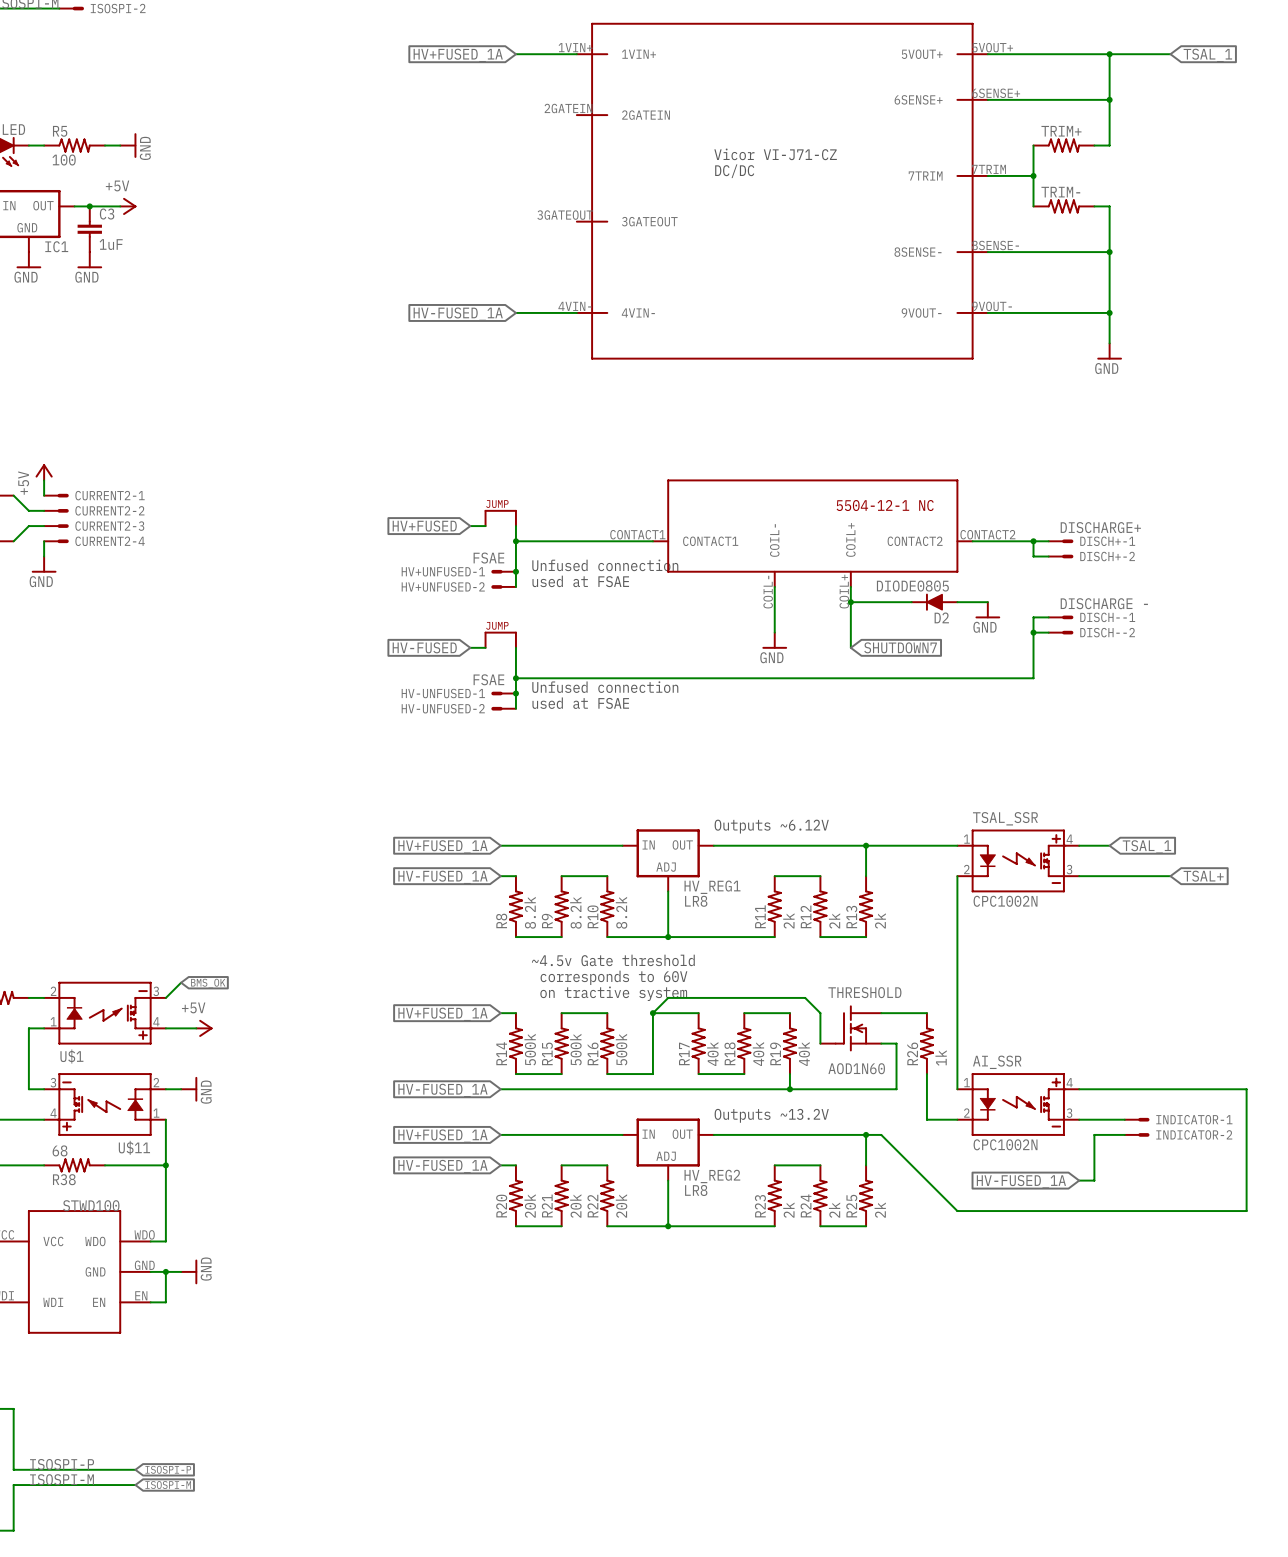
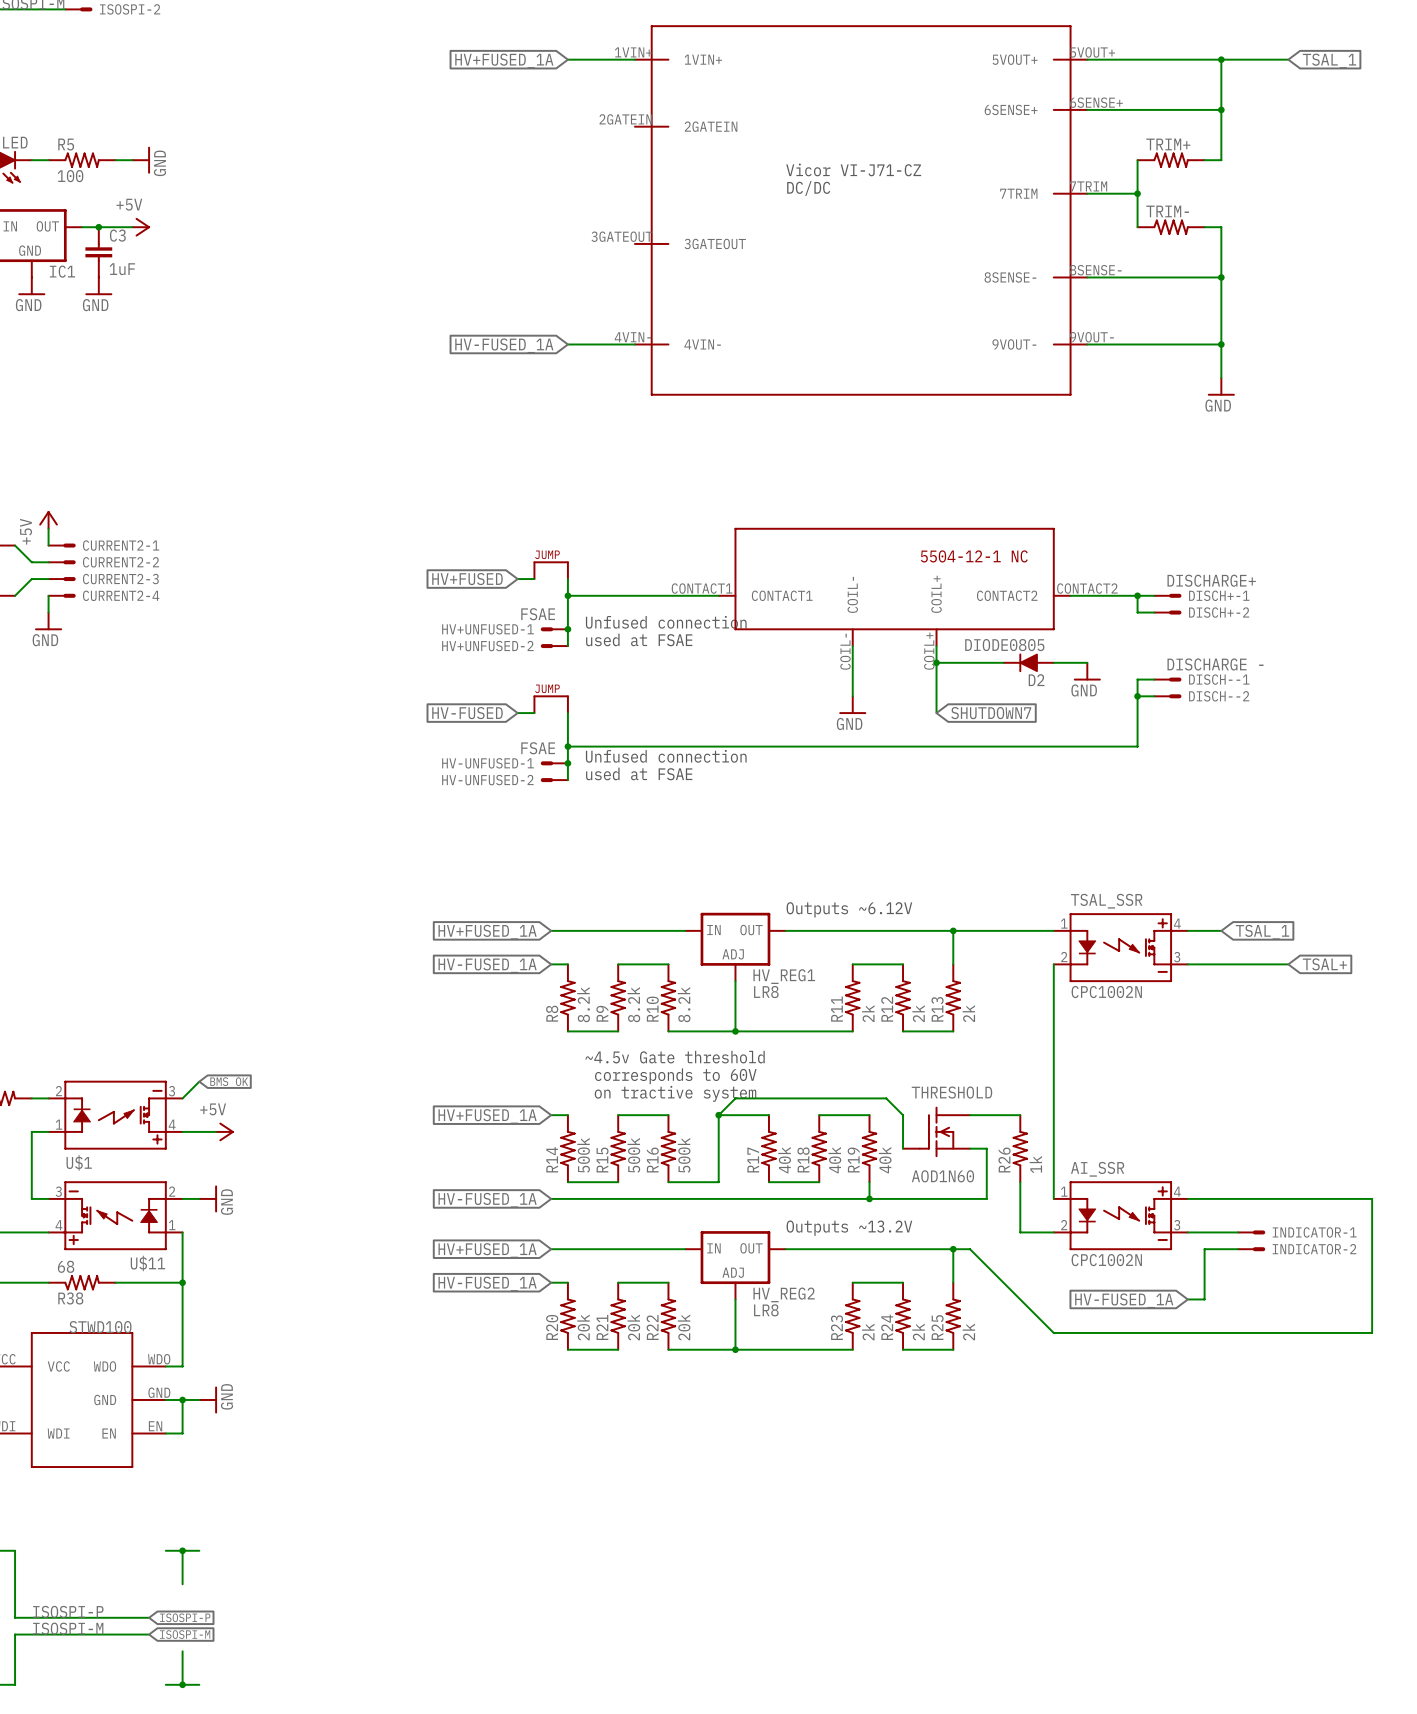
wire: none -> (165, 1550) (199, 1550)
wire: none -> (182, 1550) (182, 1584)
junction: none -> (182, 1550)
wire: none -> (182, 1651) (182, 1684)
wire: none -> (165, 1684) (199, 1684)
junction: none -> (182, 1684)

